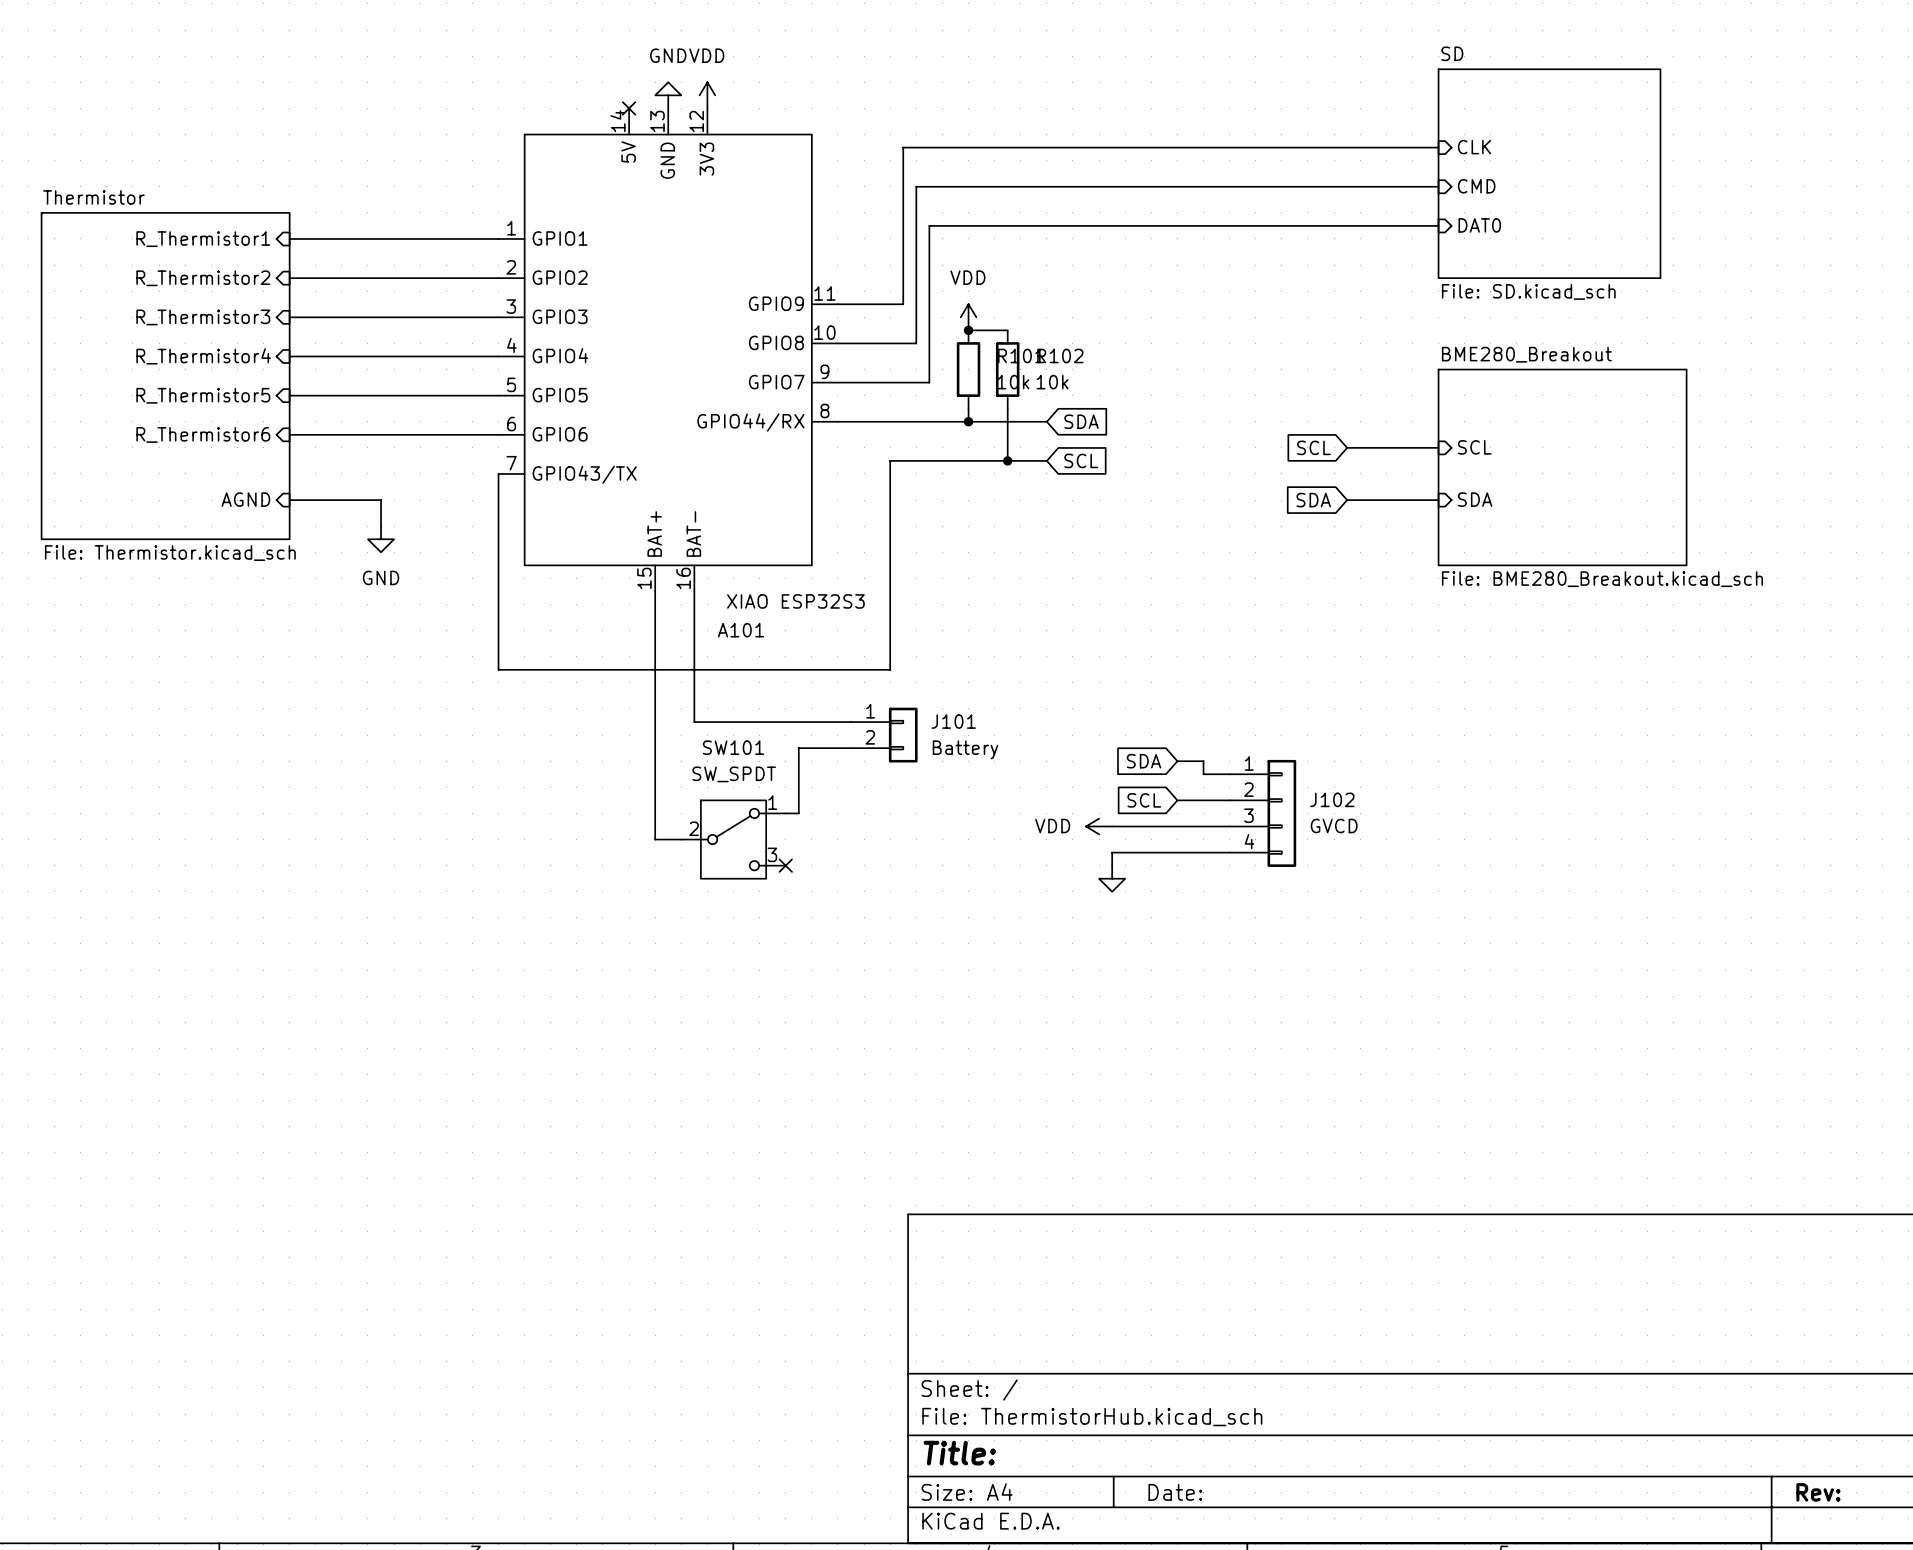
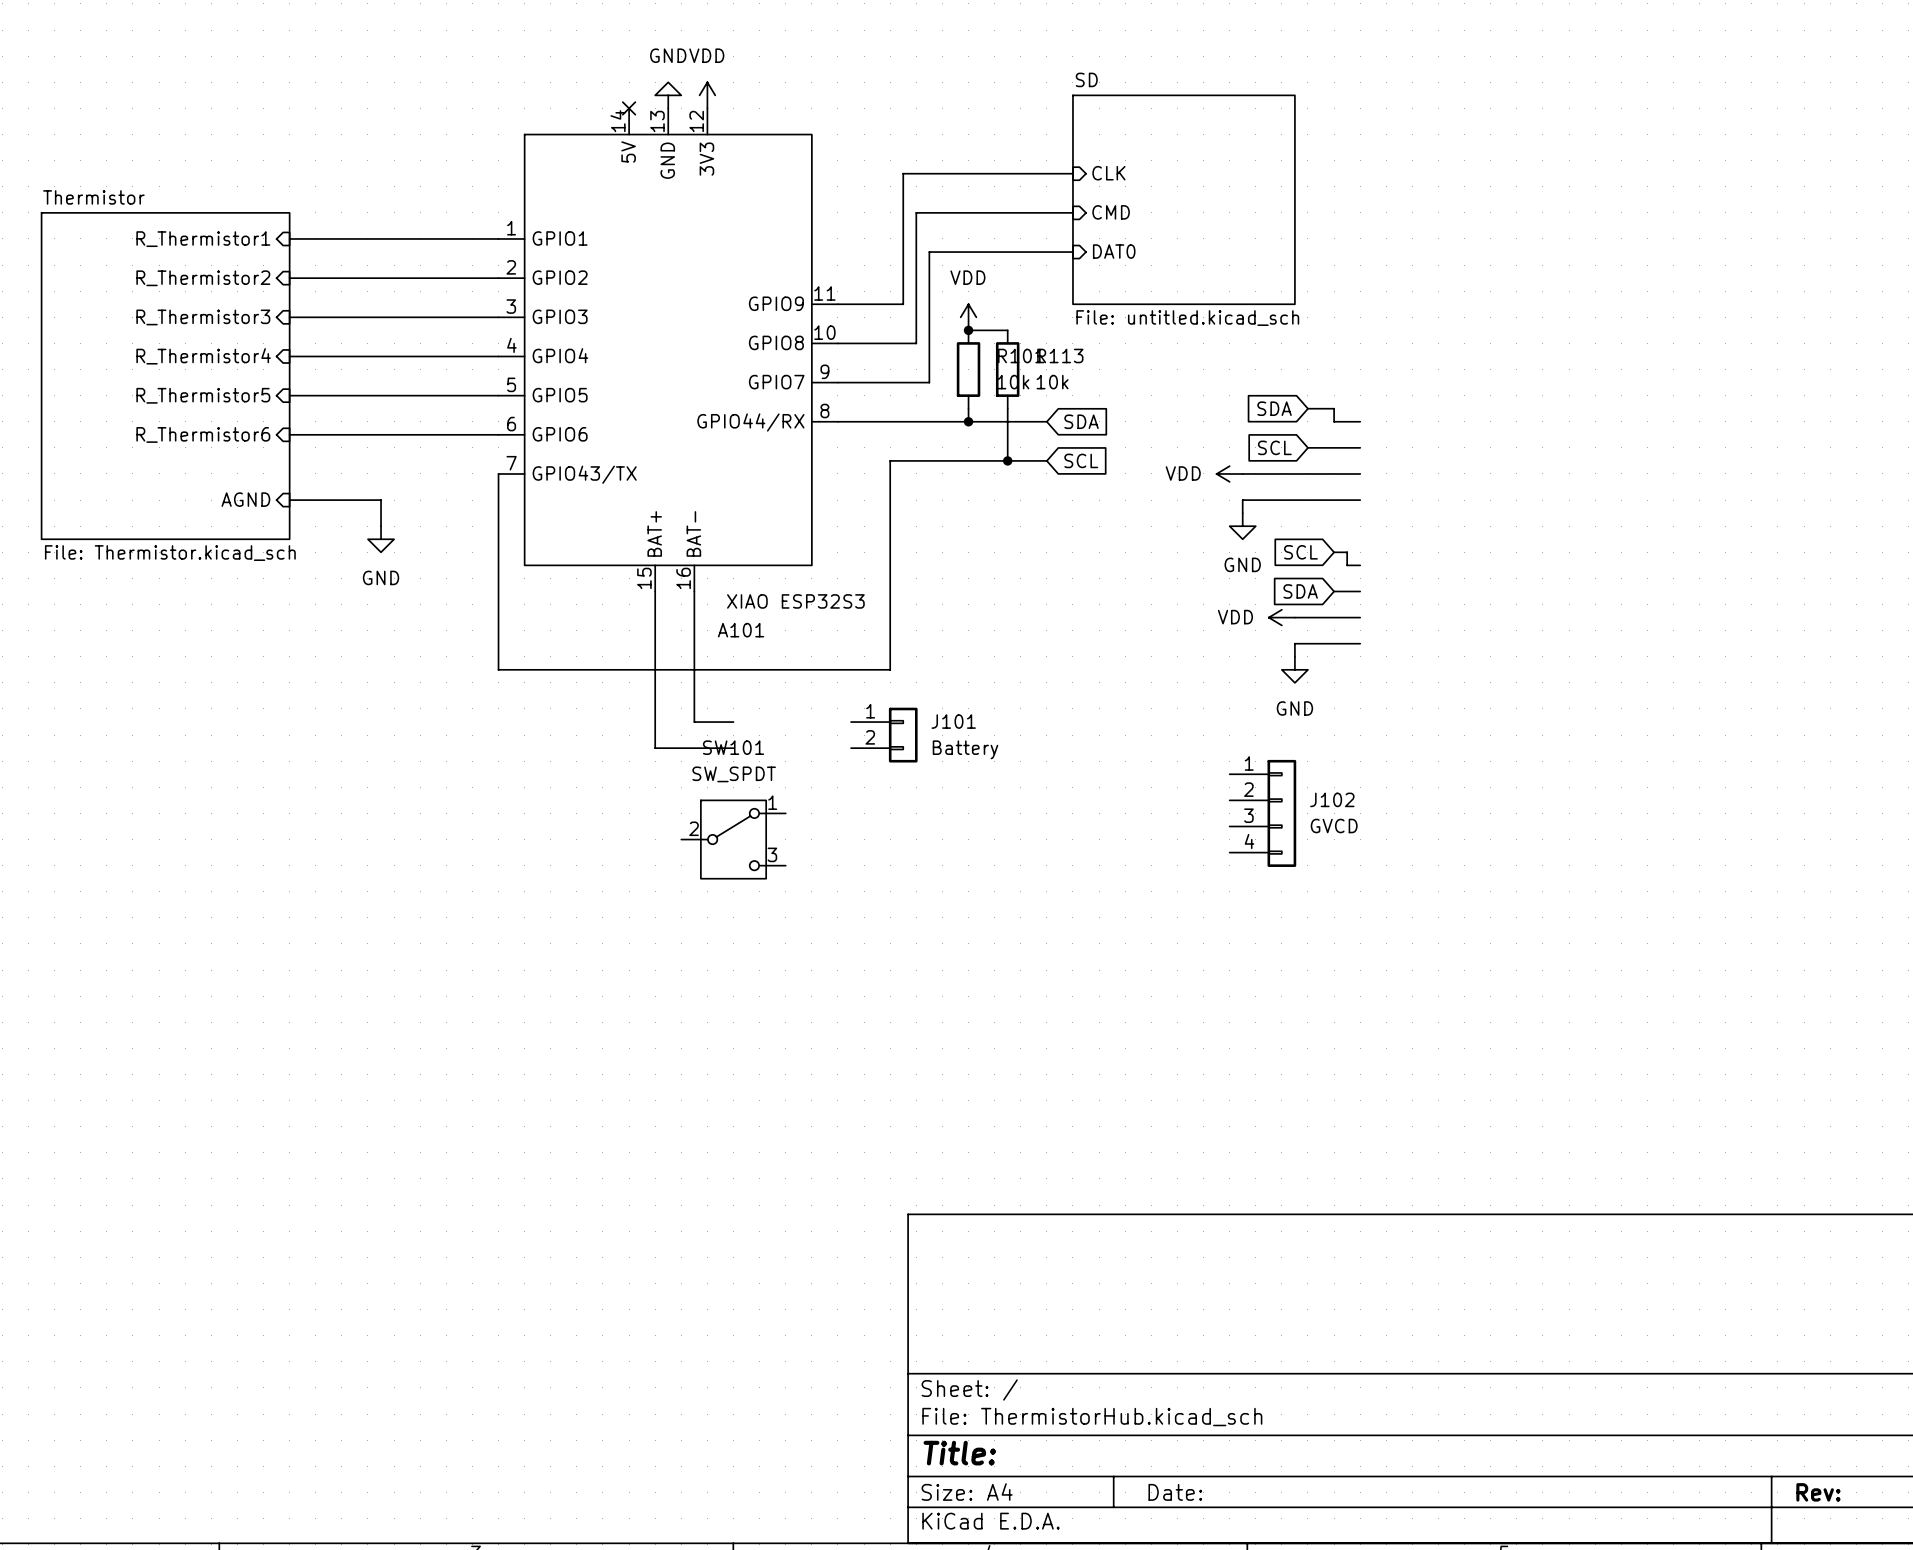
wire: (1438, 147) (903, 147) (903, 173) -> (1072, 173) (903, 173)
sheet pin: CLK (1474, 147) -> none
sheet pin: none -> CLK (1108, 173)
sheet SD: File: SD.kicad_sch (1549, 173) -> none
wire: (1438, 186) (916, 186) (916, 212) -> (1072, 212) (916, 212)
sheet pin: CMD (1476, 186) -> none
sheet SD: none -> File: untitled.kicad_sch (1183, 199)
sheet pin: none -> CMD (1111, 212)
wire: (1438, 225) (929, 225) (929, 252) -> (1072, 252) (929, 252)
sheet pin: DAT0 (1479, 225) -> none
sheet pin: none -> DAT0 (1114, 251)
R102 name: R102 (1060, 355) -> R113 (1060, 355)
global label: none -> SDA (1274, 408)
wire: none -> (1307, 408) (1334, 408) (1334, 421) (1360, 421)
wire: none -> (1307, 447) (1347, 447)
global label position: SCL (1314, 447) -> SCL (1274, 447)
wire: (1360, 447) (1438, 447) -> none
sheet pin: SCL (1474, 447) -> none
sheet BME280_Breakout: File: BME280_Breakout.kicad_sch (1562, 467) -> none
power symbol: none -> VDD (1229, 473)
wire: none -> (1242, 473) (1360, 473)
sheet pin: SDA (1475, 499) -> none
global label: SDA (1313, 500) -> none
wire: none -> (1347, 500) (1242, 500) (1242, 513)
wire: (1360, 500) (1438, 500) -> none
power symbol: none -> GND (1242, 526)
global label: none -> SCL (1300, 552)
wire: none -> (1334, 552) (1347, 552) (1347, 565) (1360, 565)
global label: none -> SDA (1300, 591)
wire: none -> (1334, 591) (1360, 591)
power symbol: none -> VDD (1281, 617)
wire: none -> (1294, 617) (1360, 617)
wire: none -> (1360, 643) (1294, 643) (1294, 656)
power symbol: none -> GND (1294, 669)
wire: (733, 722) (851, 722) -> none
wire: (655, 748) (655, 839) (681, 839) -> (655, 748) (733, 748)
wire: (851, 748) (798, 748) (798, 813) (785, 813) -> none
global label: SDA (1143, 761) -> none
wire: (1177, 761) (1203, 761) (1203, 774) (1229, 774) -> none
global label: SCL (1144, 800) -> none
wire: (1177, 800) (1229, 800) -> none
power symbol: VDD (1099, 826) -> none
wire: (1112, 826) (1229, 826) -> none
wire: (1229, 852) (1112, 852) (1112, 865) -> none
no-connect mark: (785, 865) -> none
power symbol: (1112, 878) -> none

